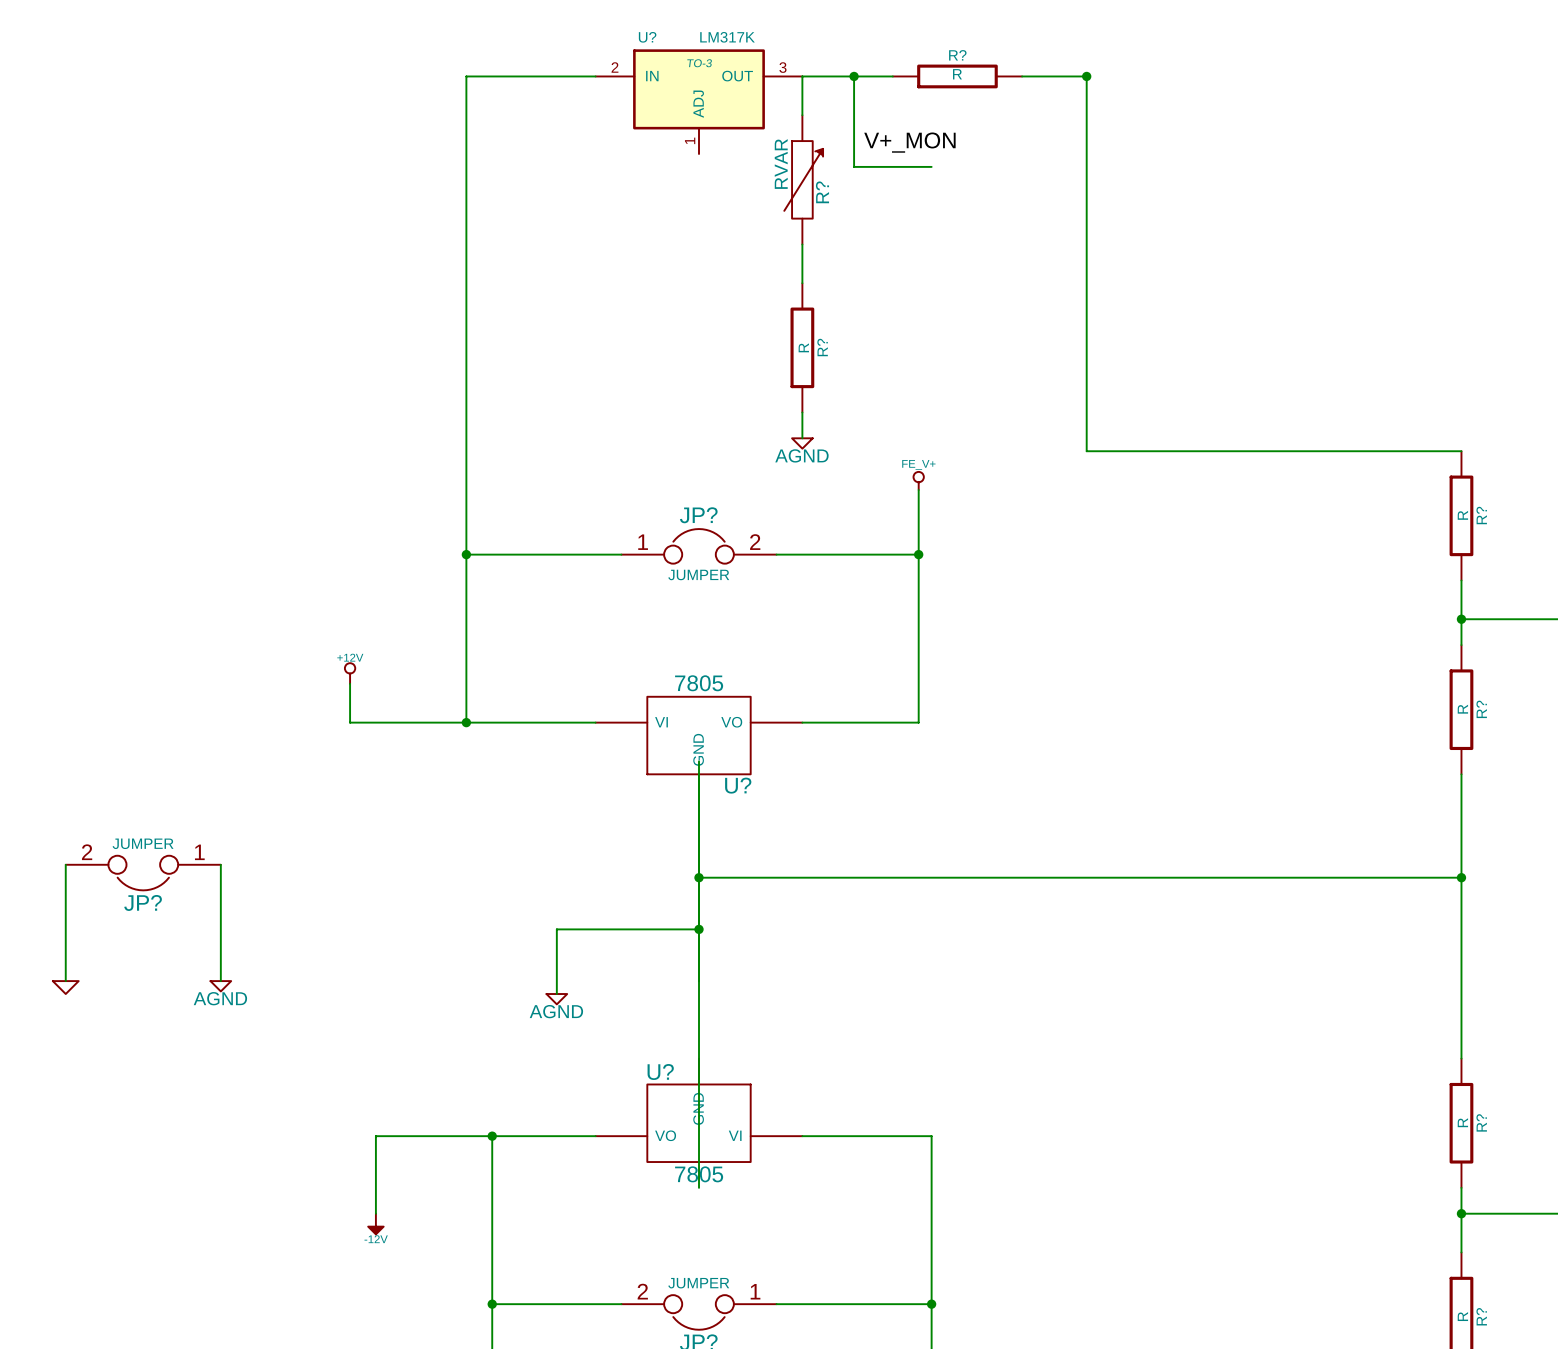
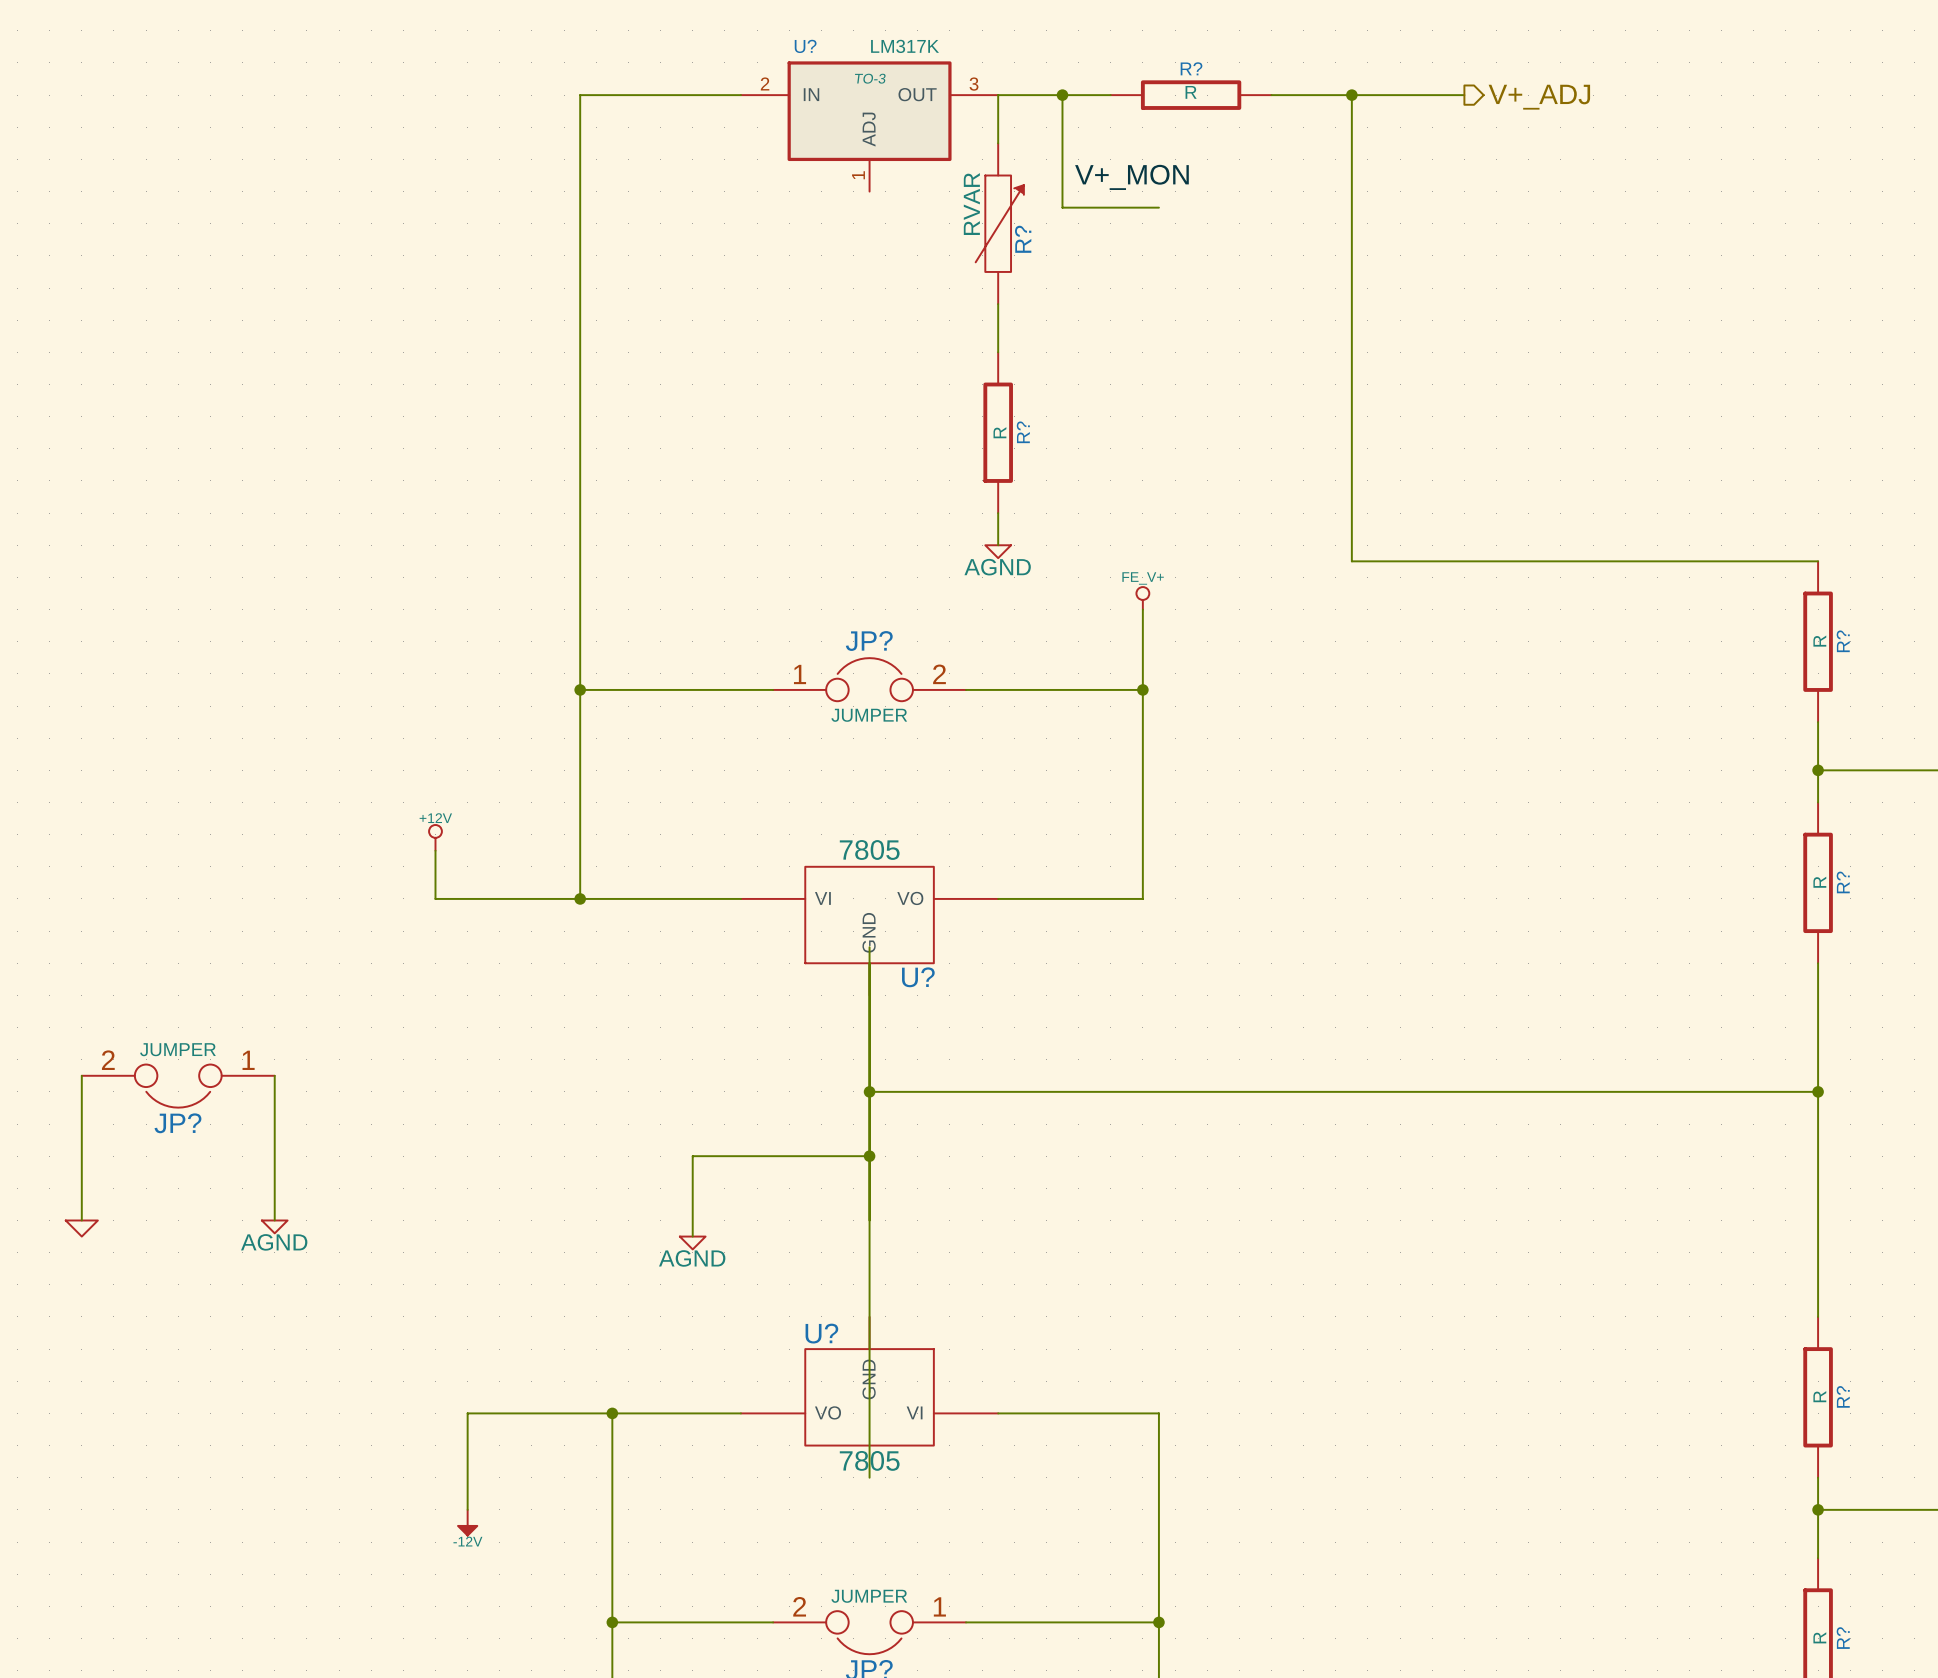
wire: none -> (1351, 95) (1464, 95)
hierarchical label: none -> V+_ADJ (1539, 97)

